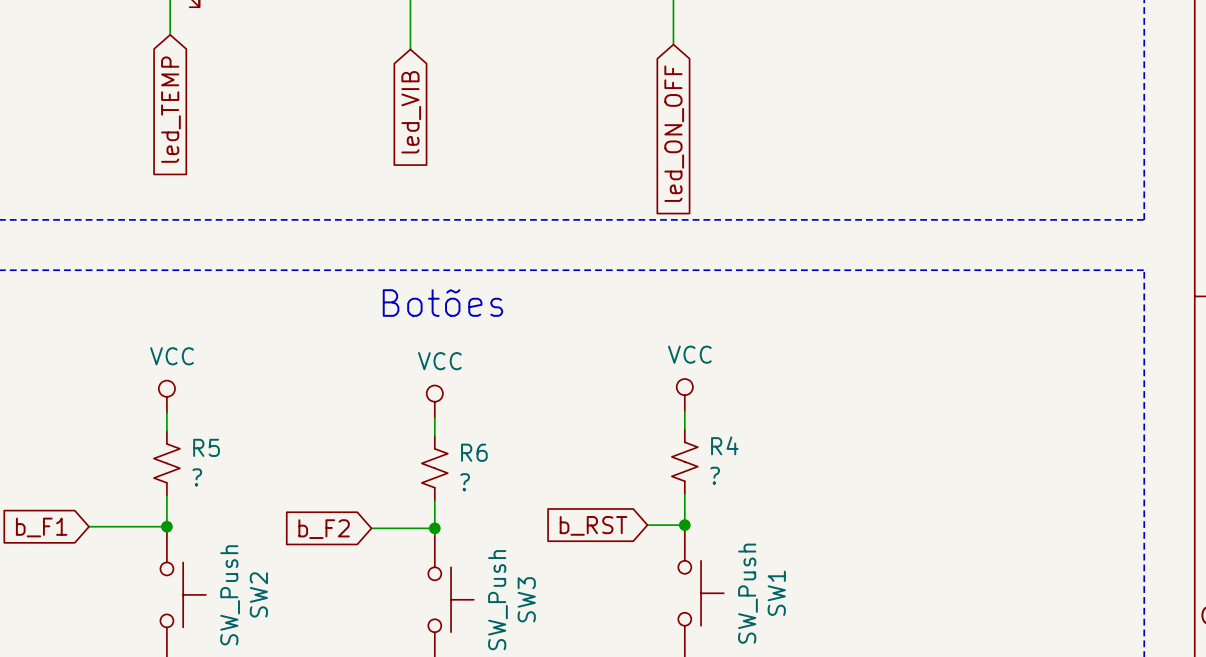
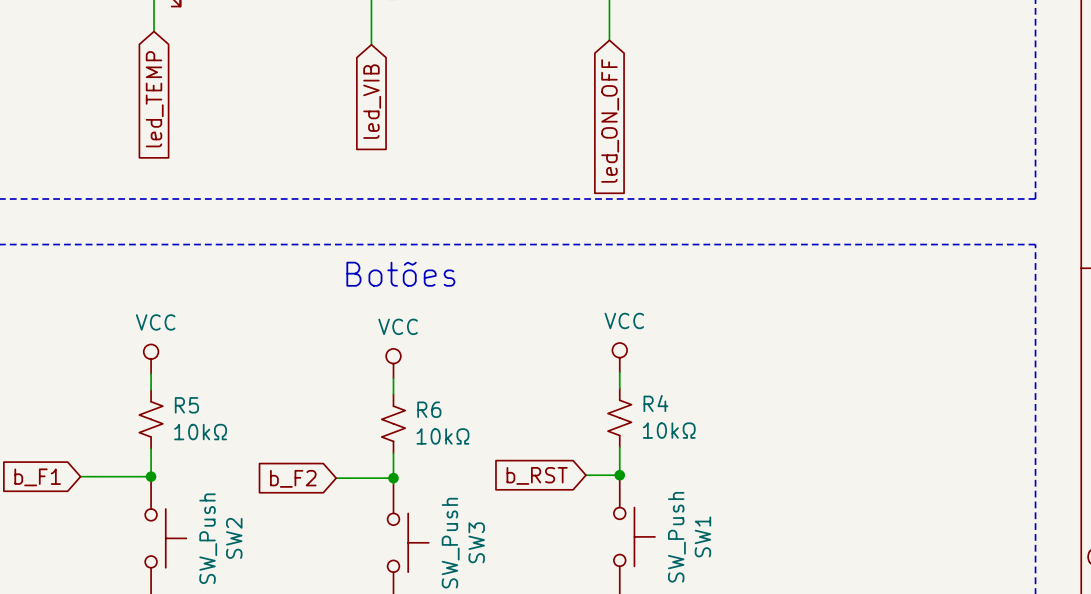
R4 value: ? (715, 475) -> 10kΩ (669, 430)
R5 value: ? (197, 477) -> 10kΩ (200, 432)
R6 value: ? (465, 482) -> 10kΩ (442, 436)

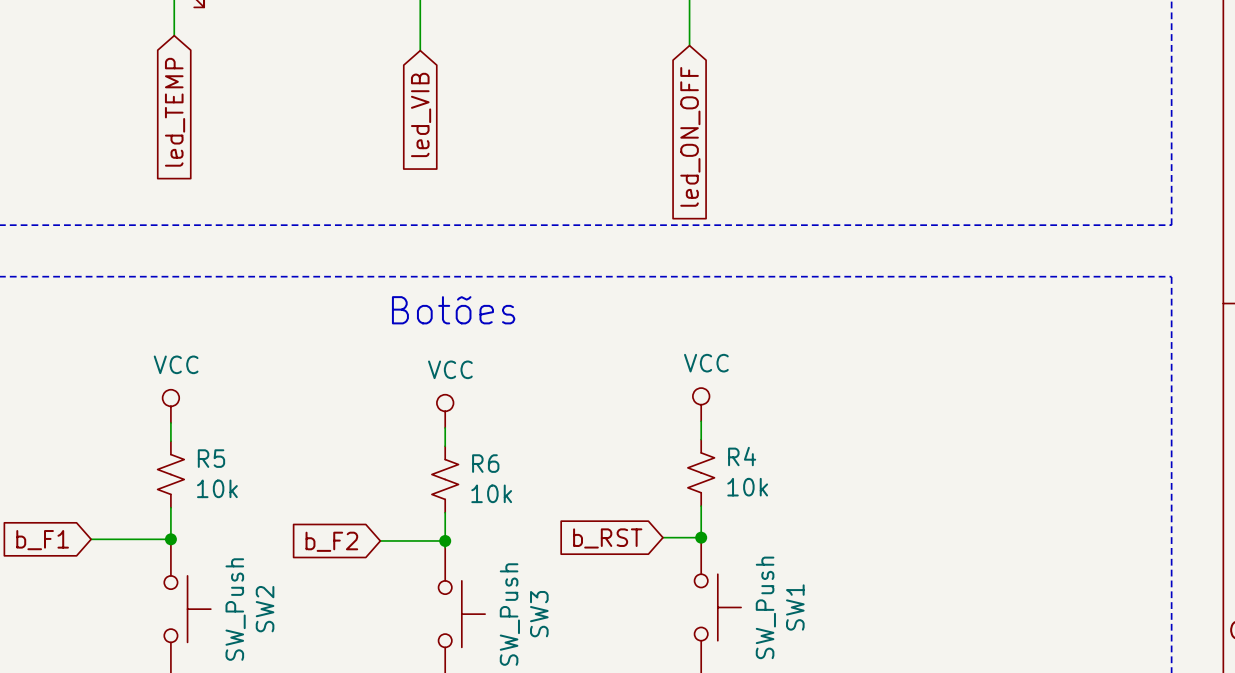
R4 value: 10kΩ (669, 430) -> 10k (747, 487)
R5 value: 10kΩ (200, 432) -> 10k (217, 488)
R6 value: 10kΩ (442, 436) -> 10k (491, 493)

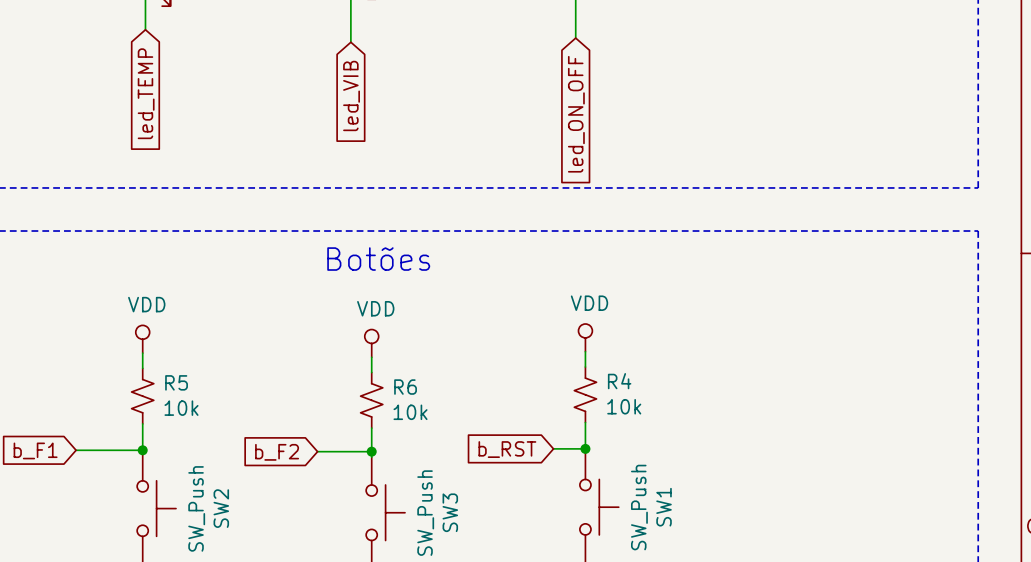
power symbol: VCC (701, 404) -> VDD (585, 337)
power symbol: VCC (170, 406) -> VDD (142, 339)
power symbol: VCC (445, 411) -> VDD (371, 343)

